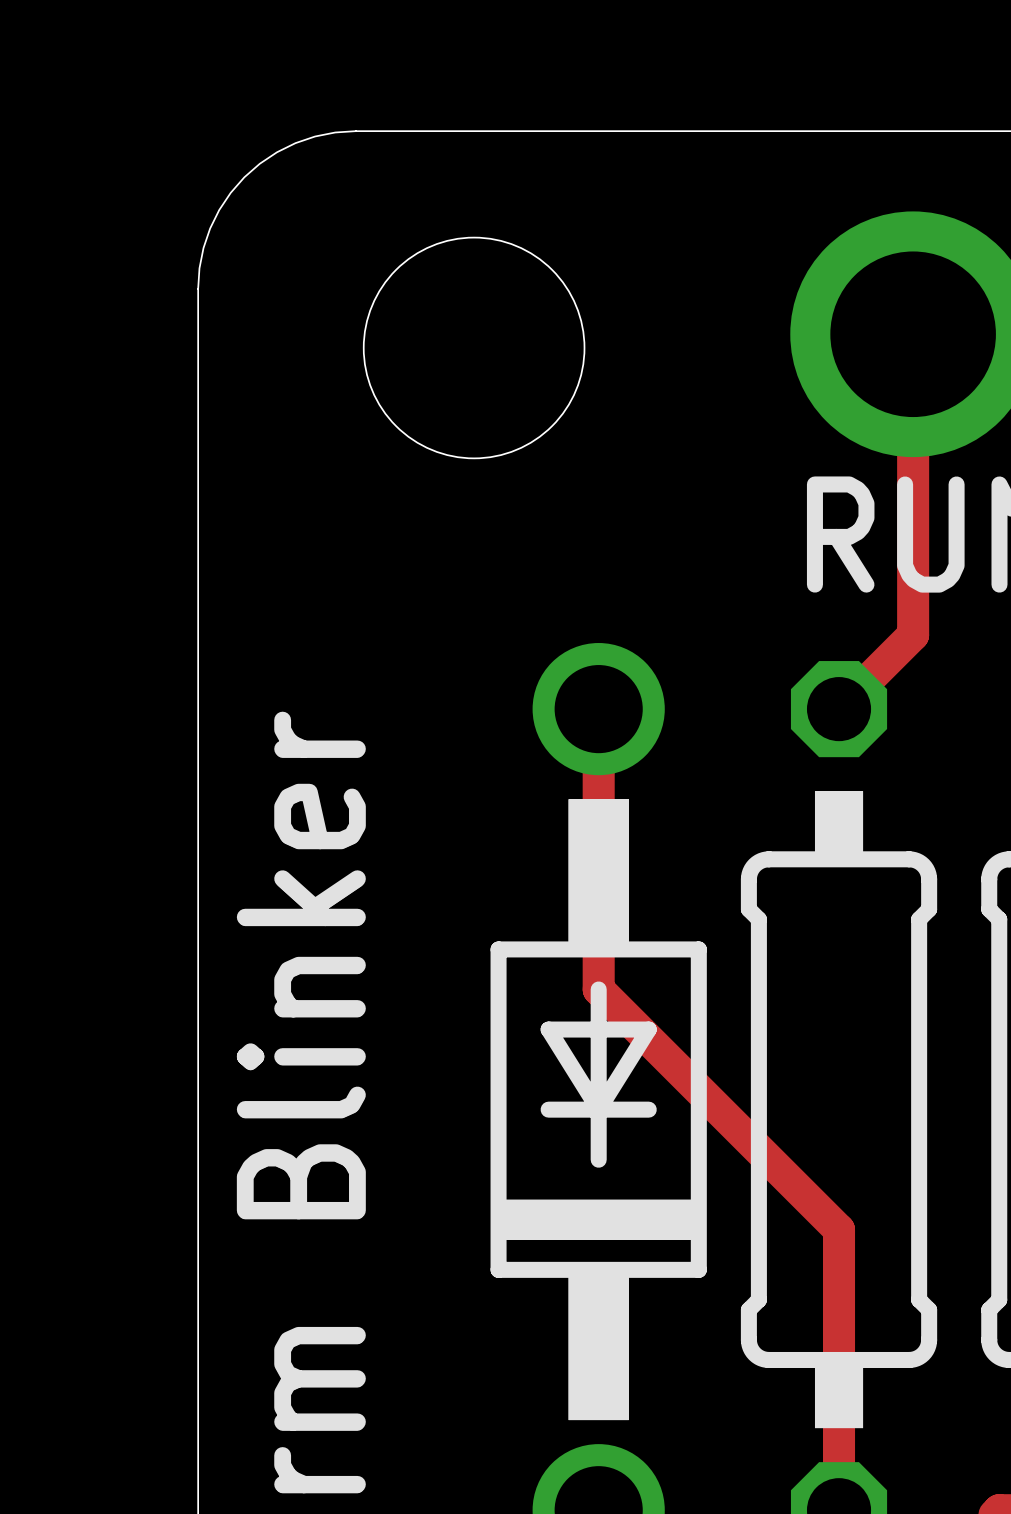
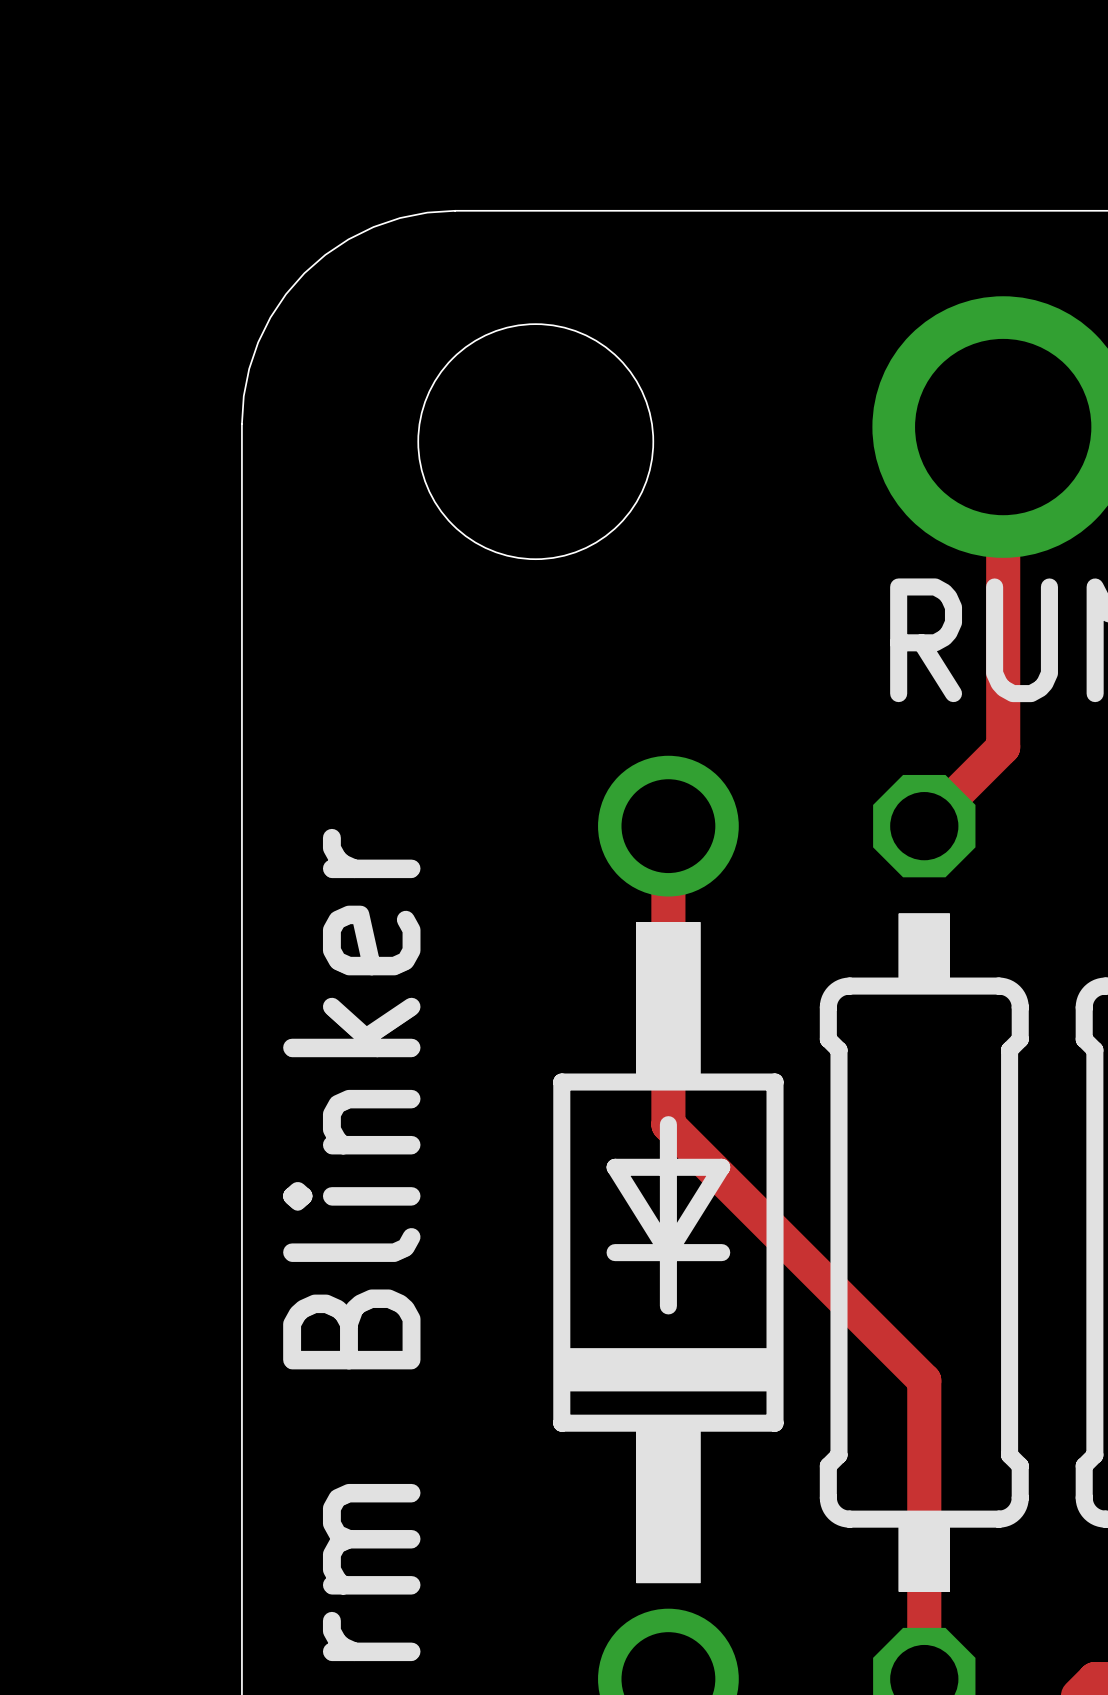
board edge: (398, 131) (355, 131) (315, 136) (276, 152) (244, 177) (219, 209) (203, 248) (198, 288) (198, 331) -> (455, 210) (427, 212) (399, 218) (373, 227) (348, 239) (325, 254) (304, 273) (286, 294) (270, 317) (258, 342) (249, 368) (243, 396) (241, 424)

